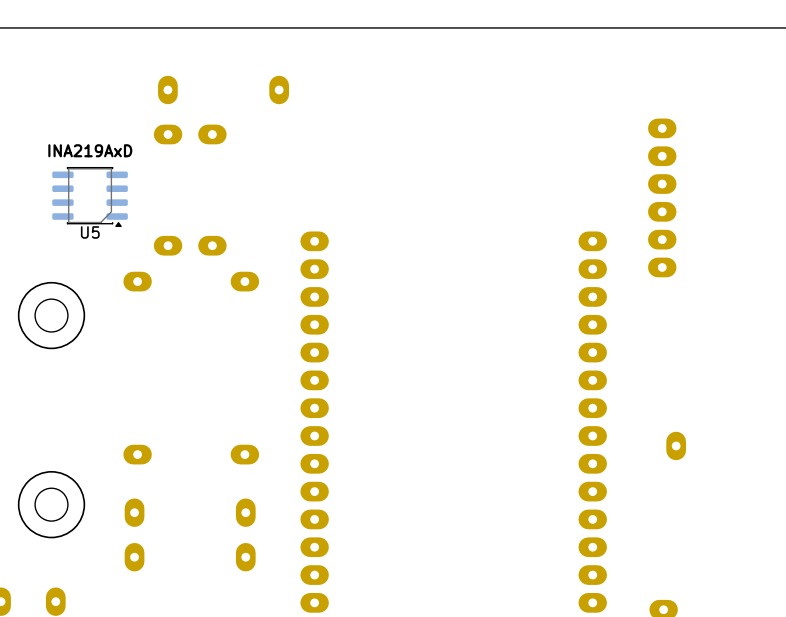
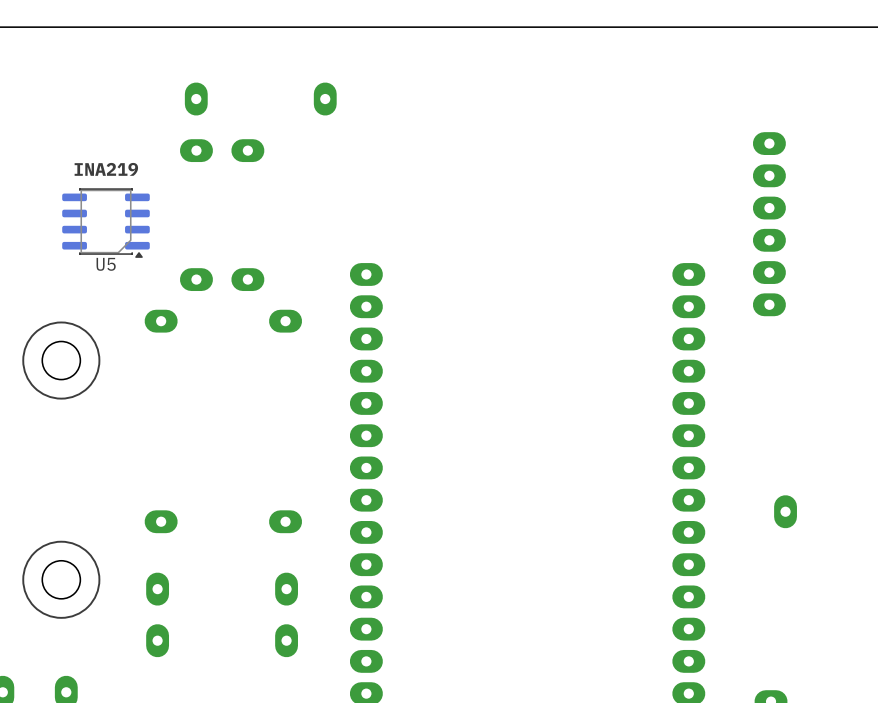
U5 value: INA219AxD (90, 150) -> INA219 (106, 169)

